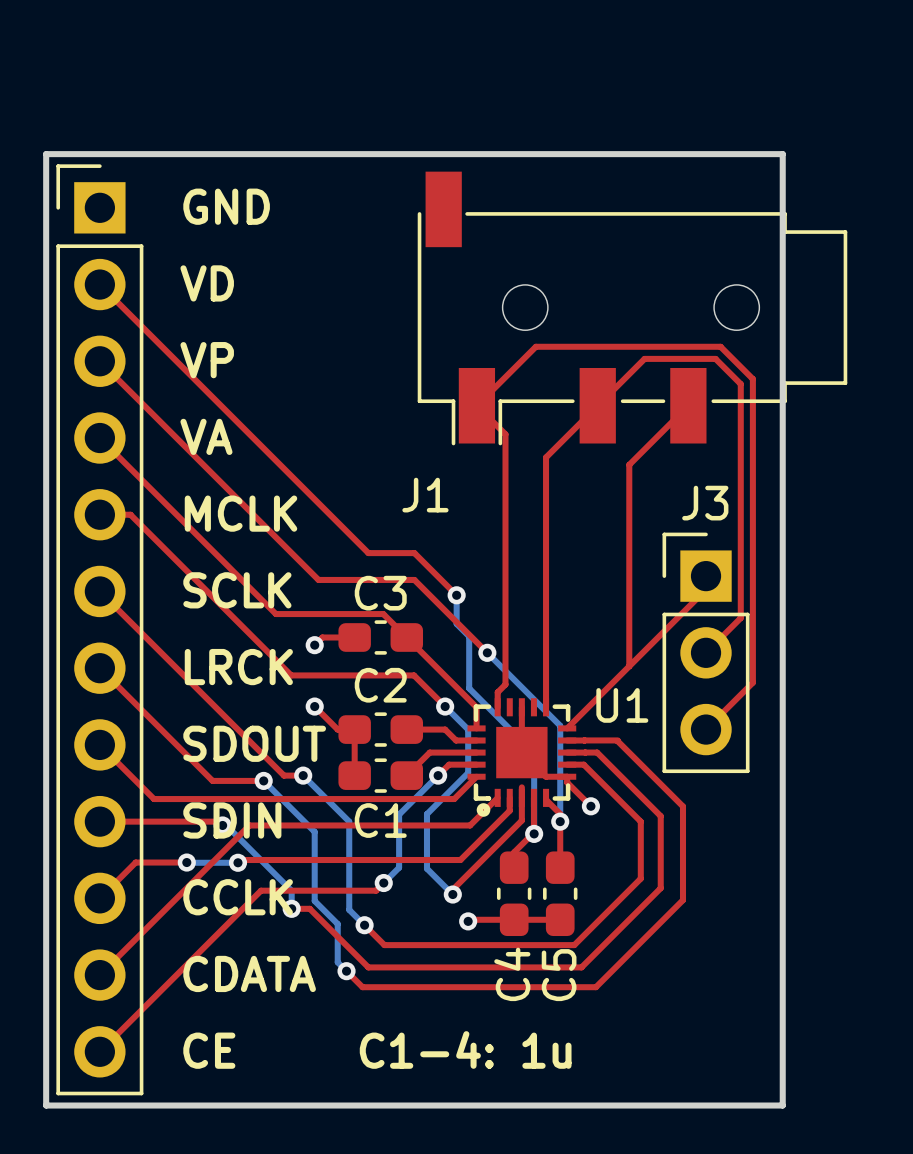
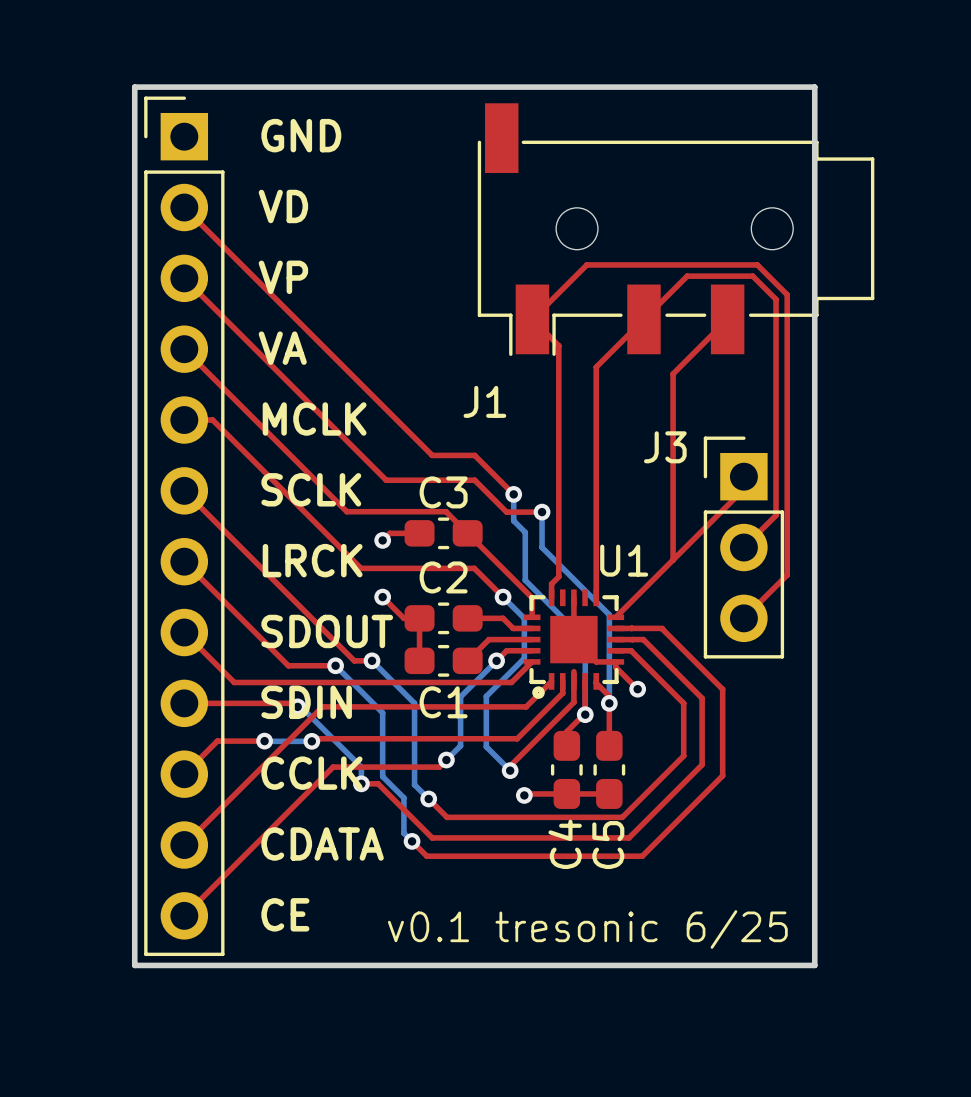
J3 name position: J3 (705, 503) -> J3 (665, 447)
top track: (448, 614) (487, 652) -> (506, 512) (542, 512)
bottom track: none -> (542, 512) (542, 547)
via position: (487, 652) -> (542, 512)
U1 name position: U1 (622, 705) -> U1 (624, 560)
text: C1-4: 1u (465, 1049) -> none
text: none -> v0.1 tresonic 6/25 (587, 929)

